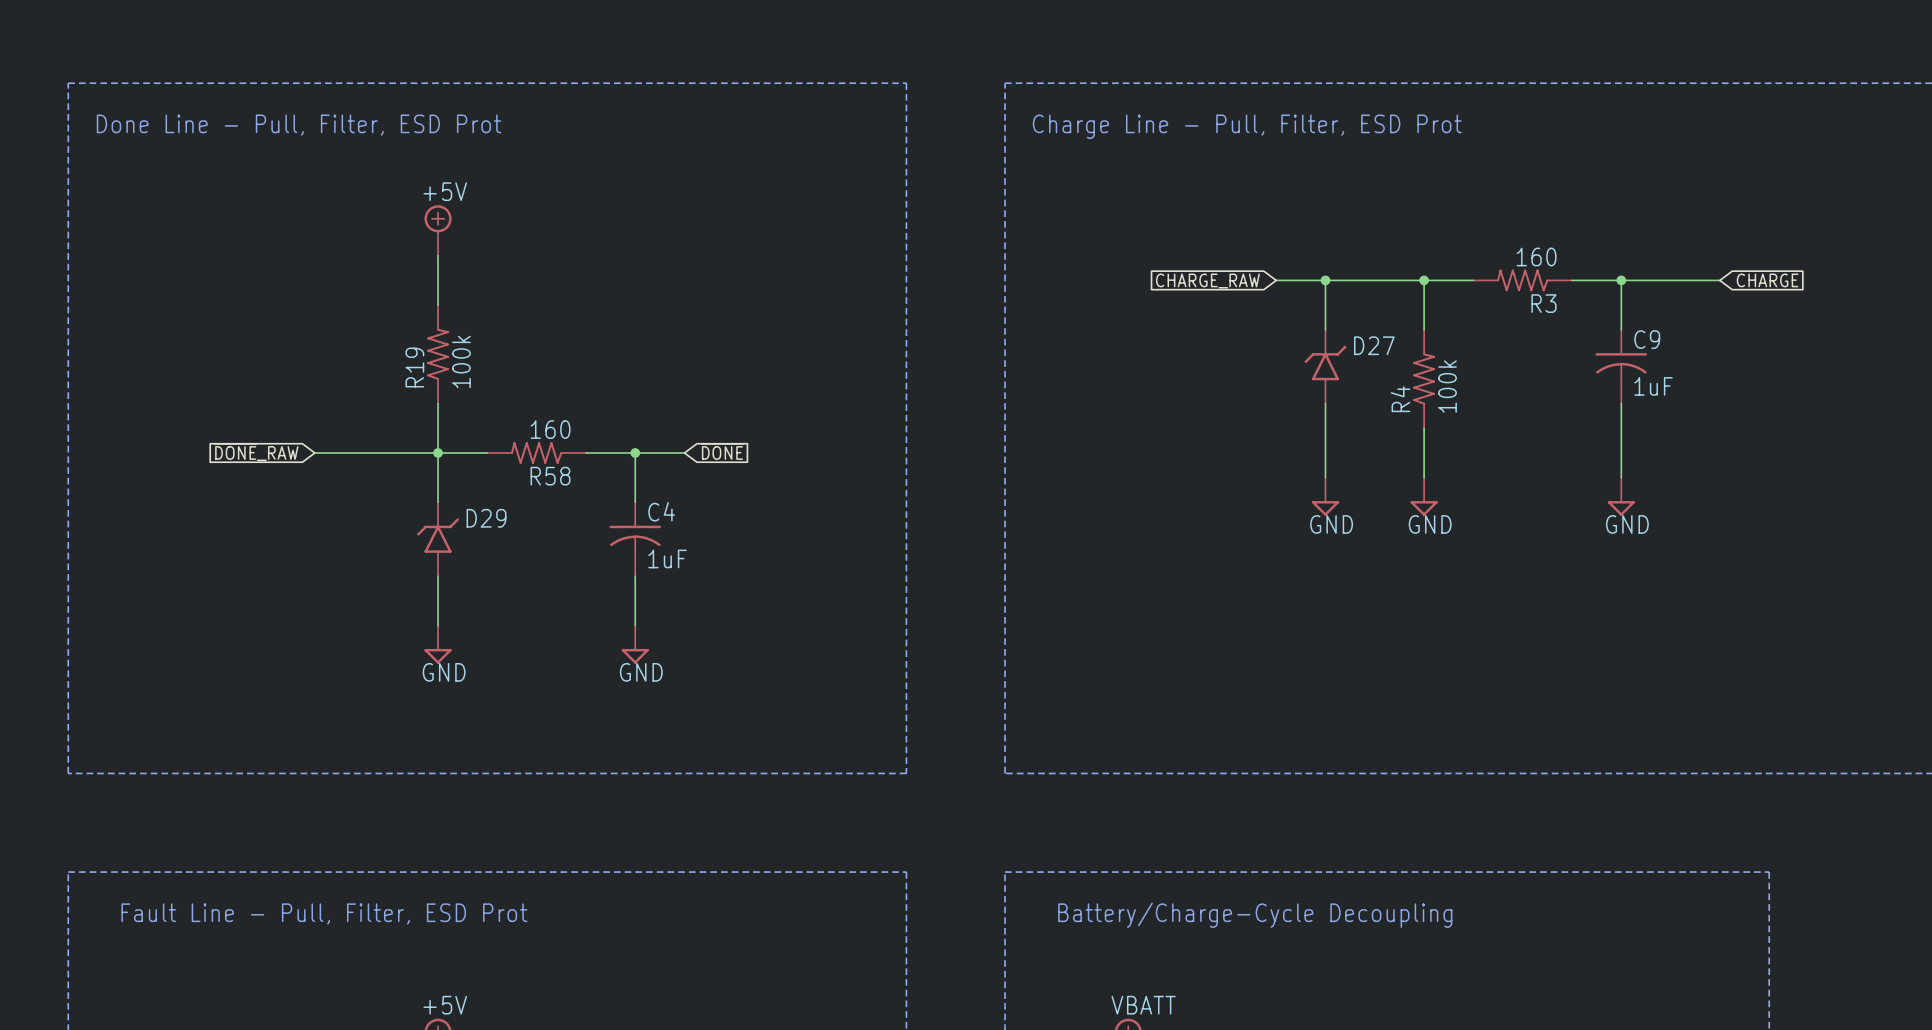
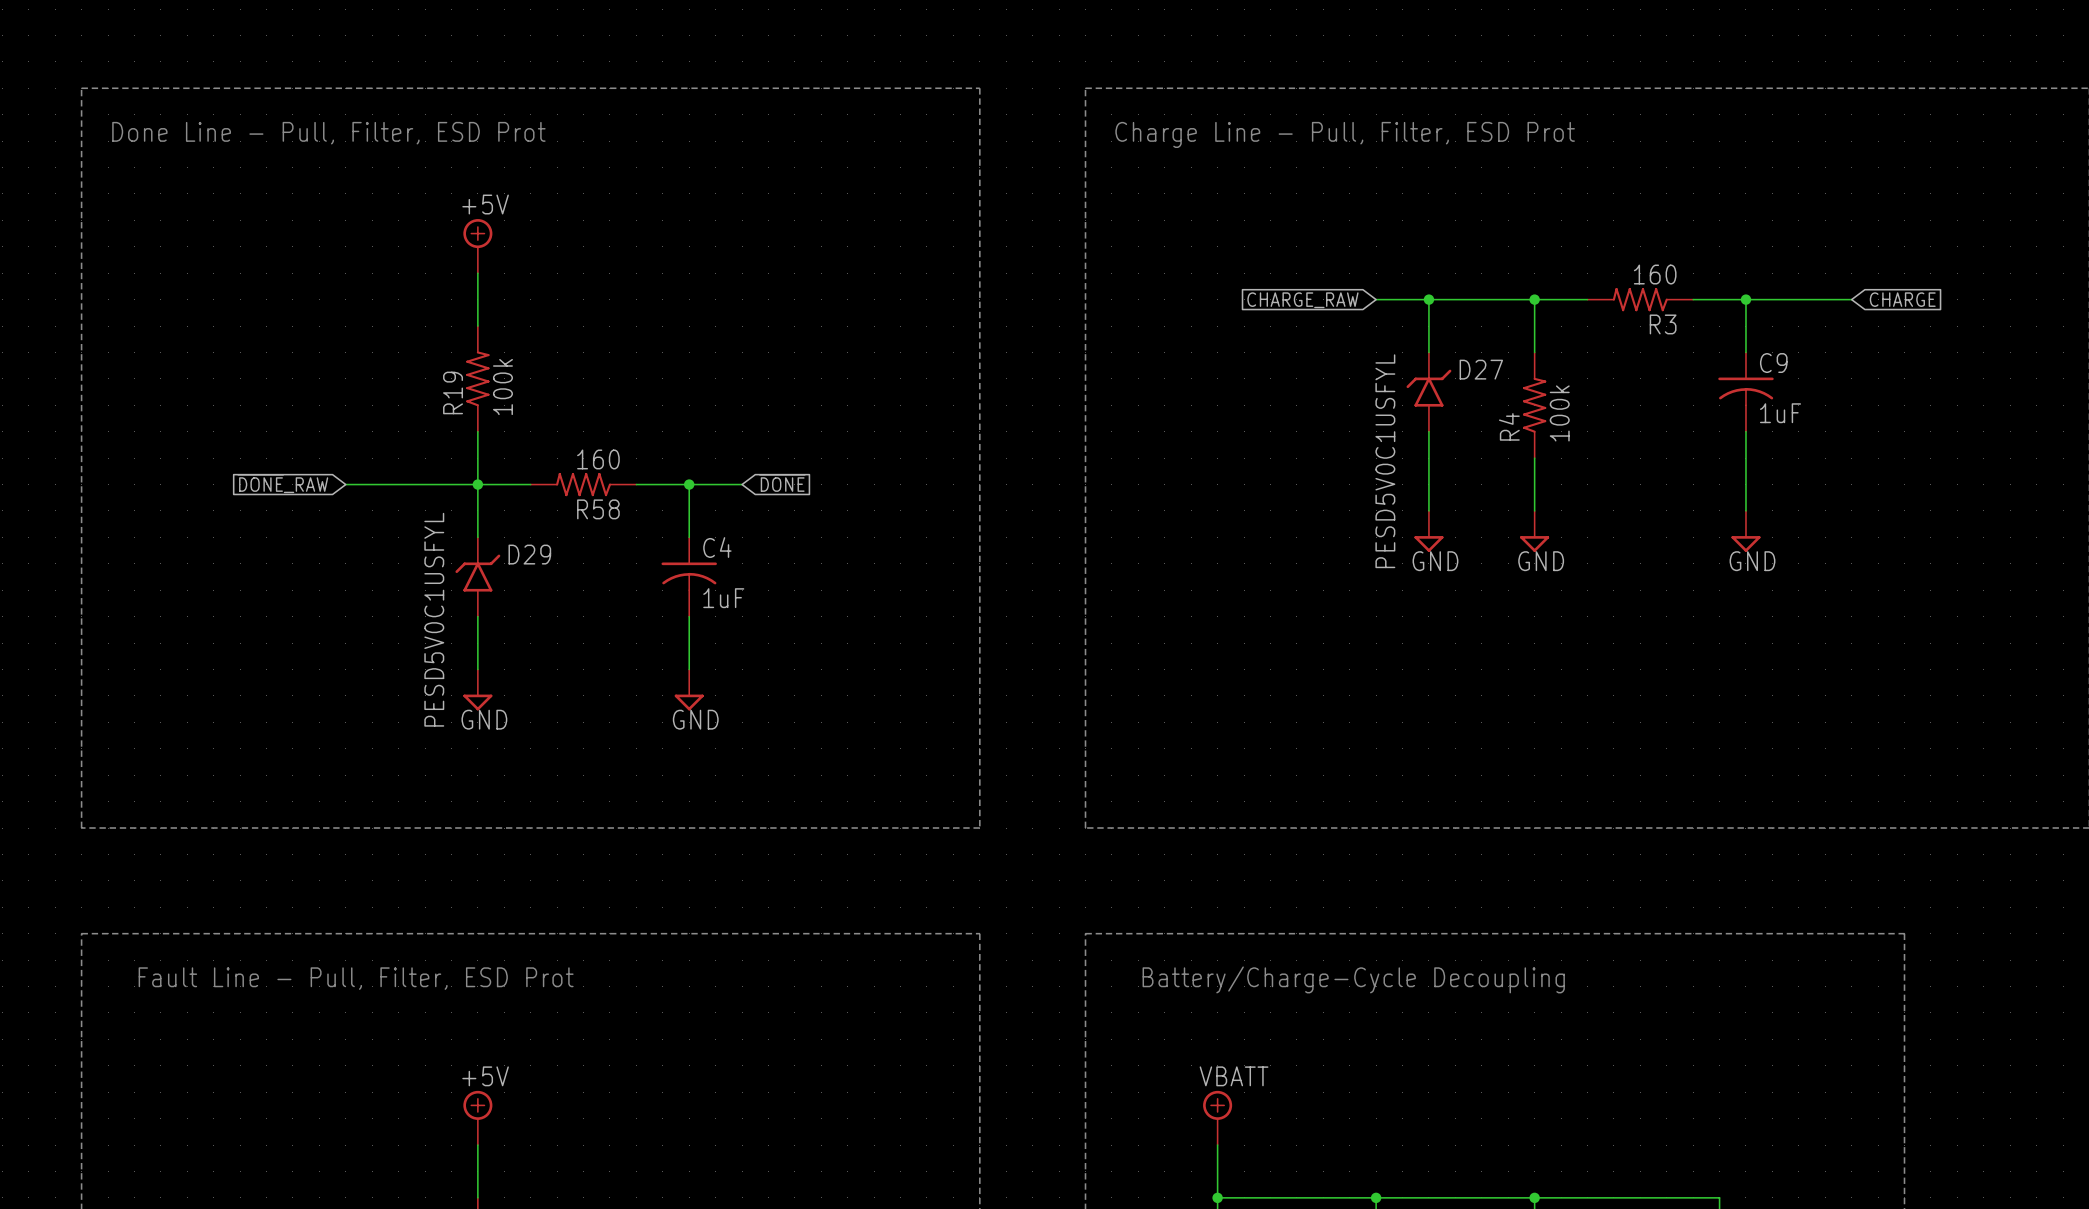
D27 value: none -> PESD5V0C1USFYL (1385, 461)
D29 value: none -> PESD5V0C1USFYL (434, 619)

